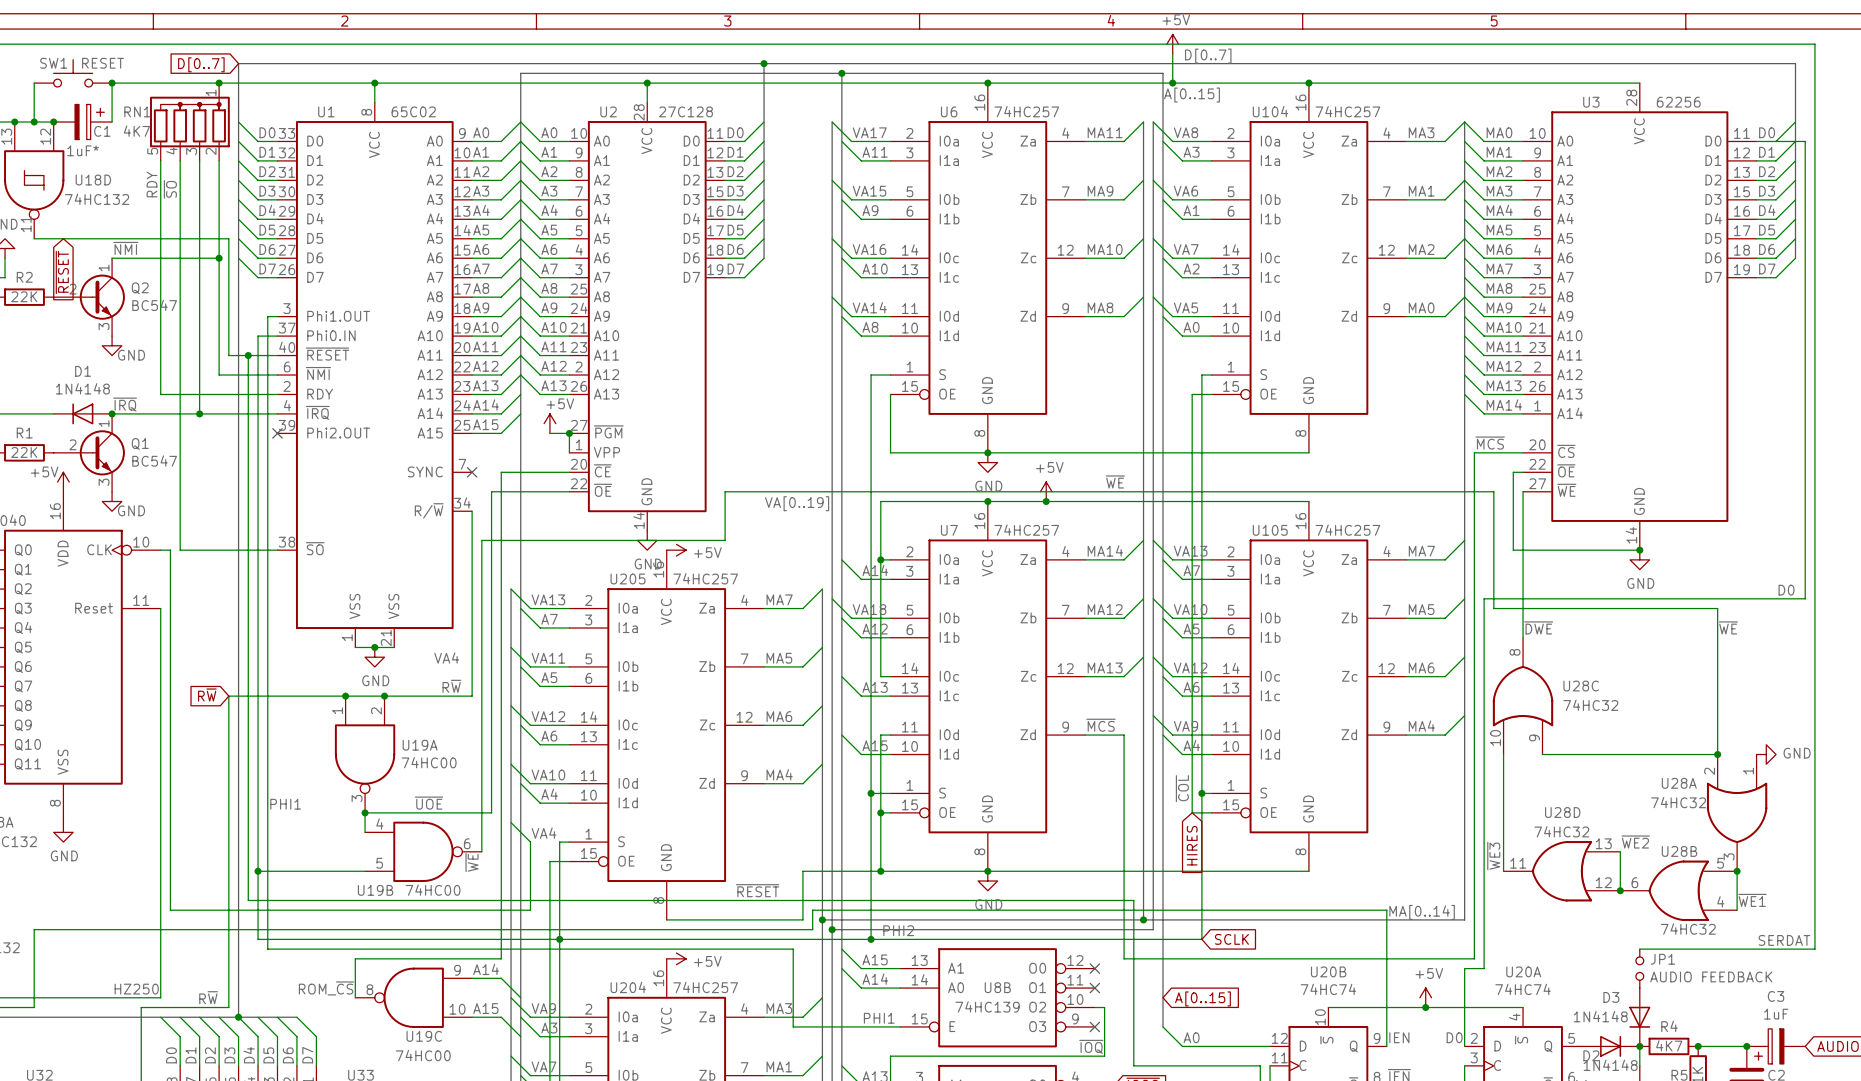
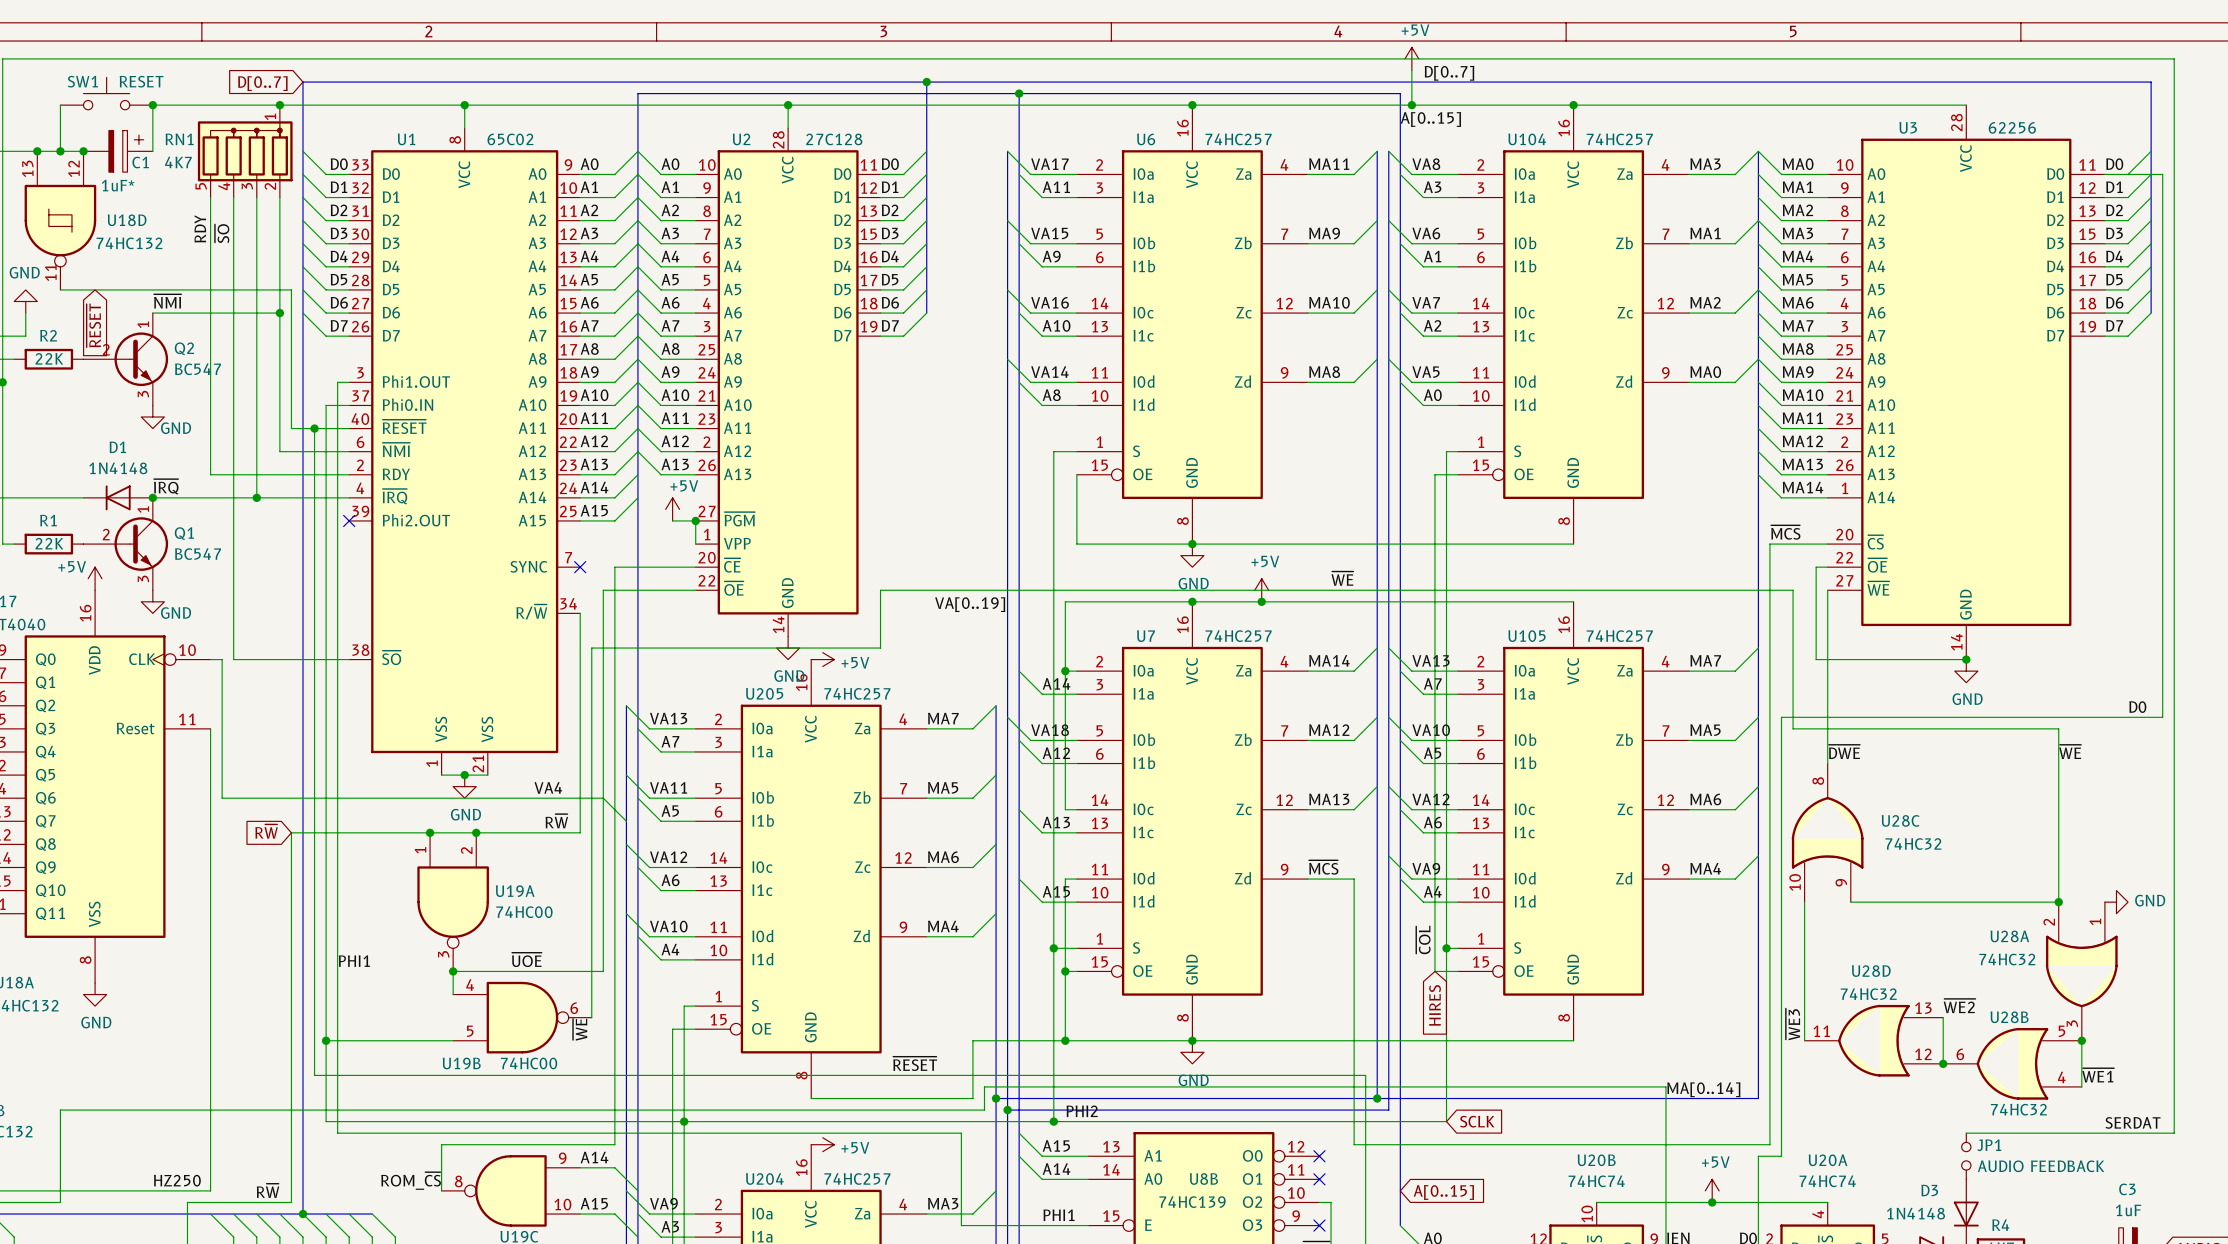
wire: (170, 666) (170, 910) (530, 910) (530, 842) (511, 822) -> (222, 798) (603, 798) (626, 821)
label: VA4 (543, 833) -> none

